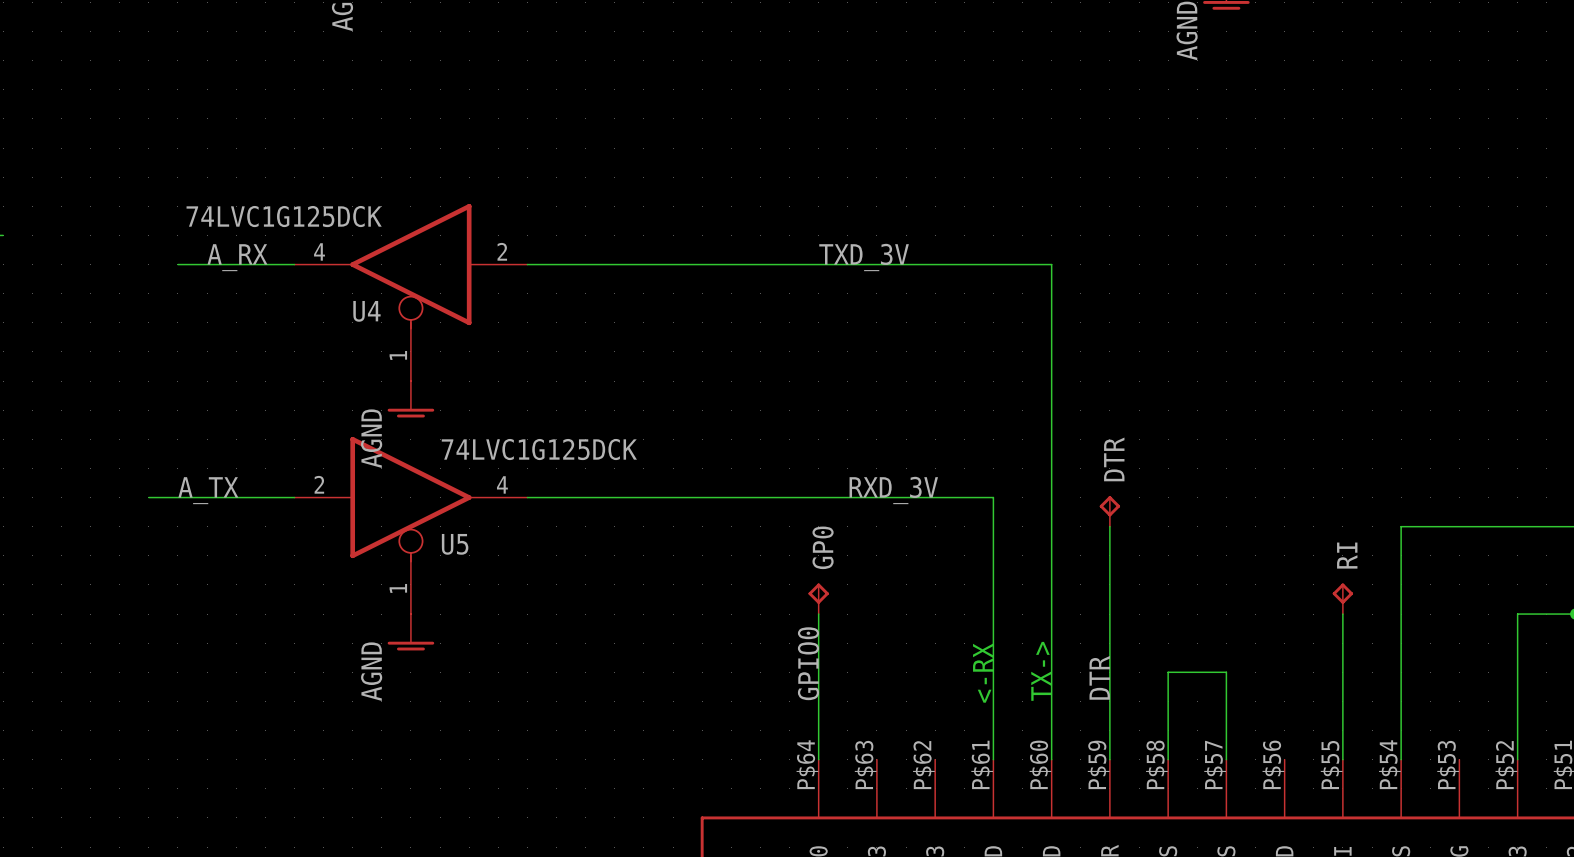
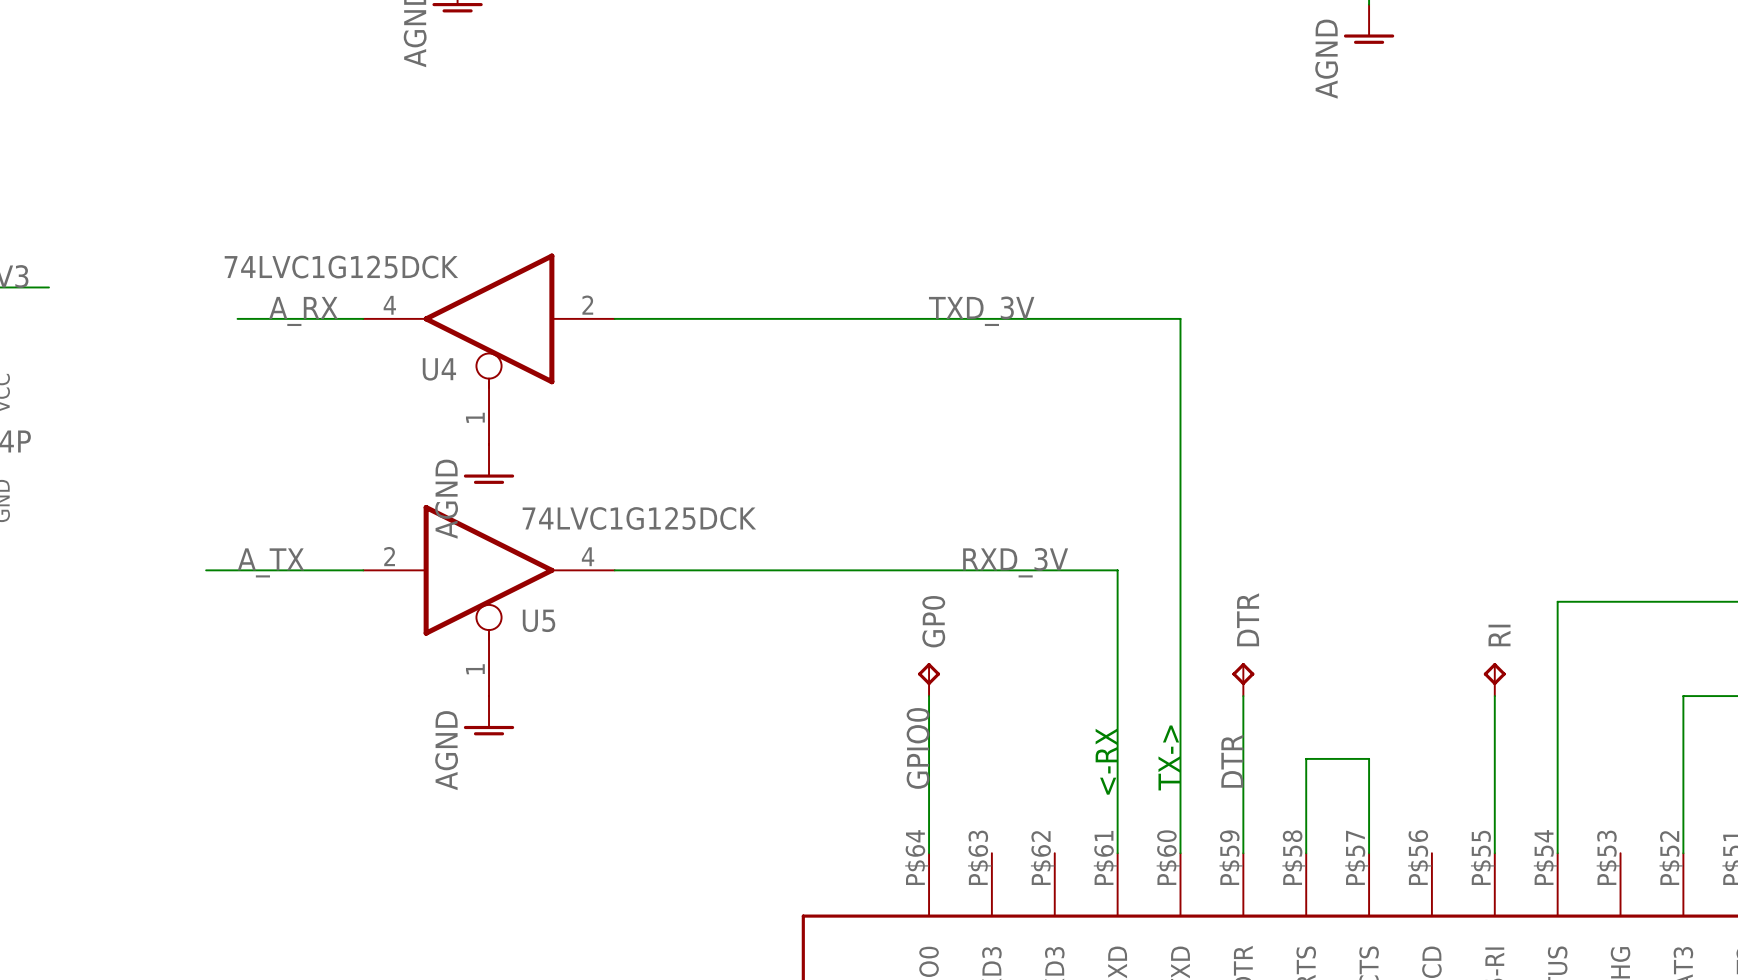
DTR position: (1109, 511) -> (1243, 679)
wire: (1109, 526) (1109, 614) -> none

